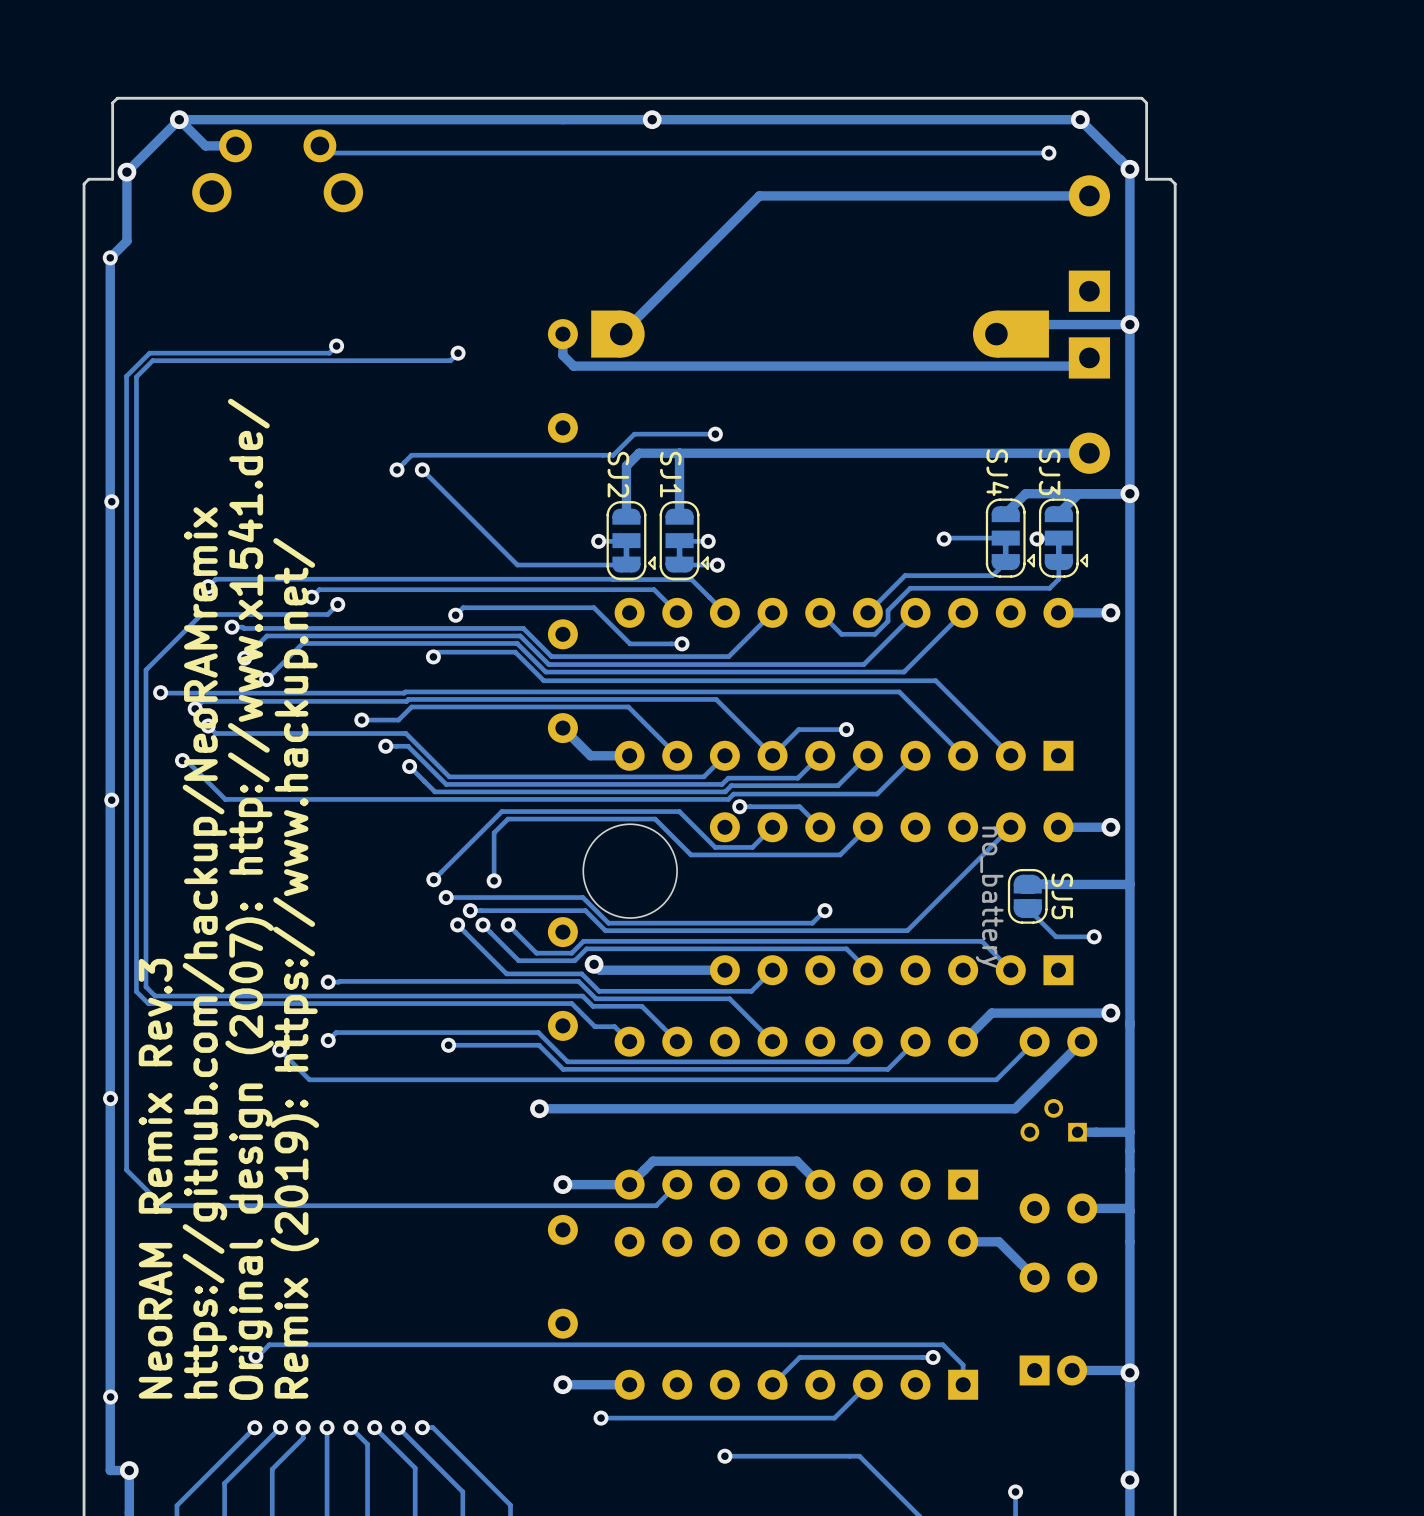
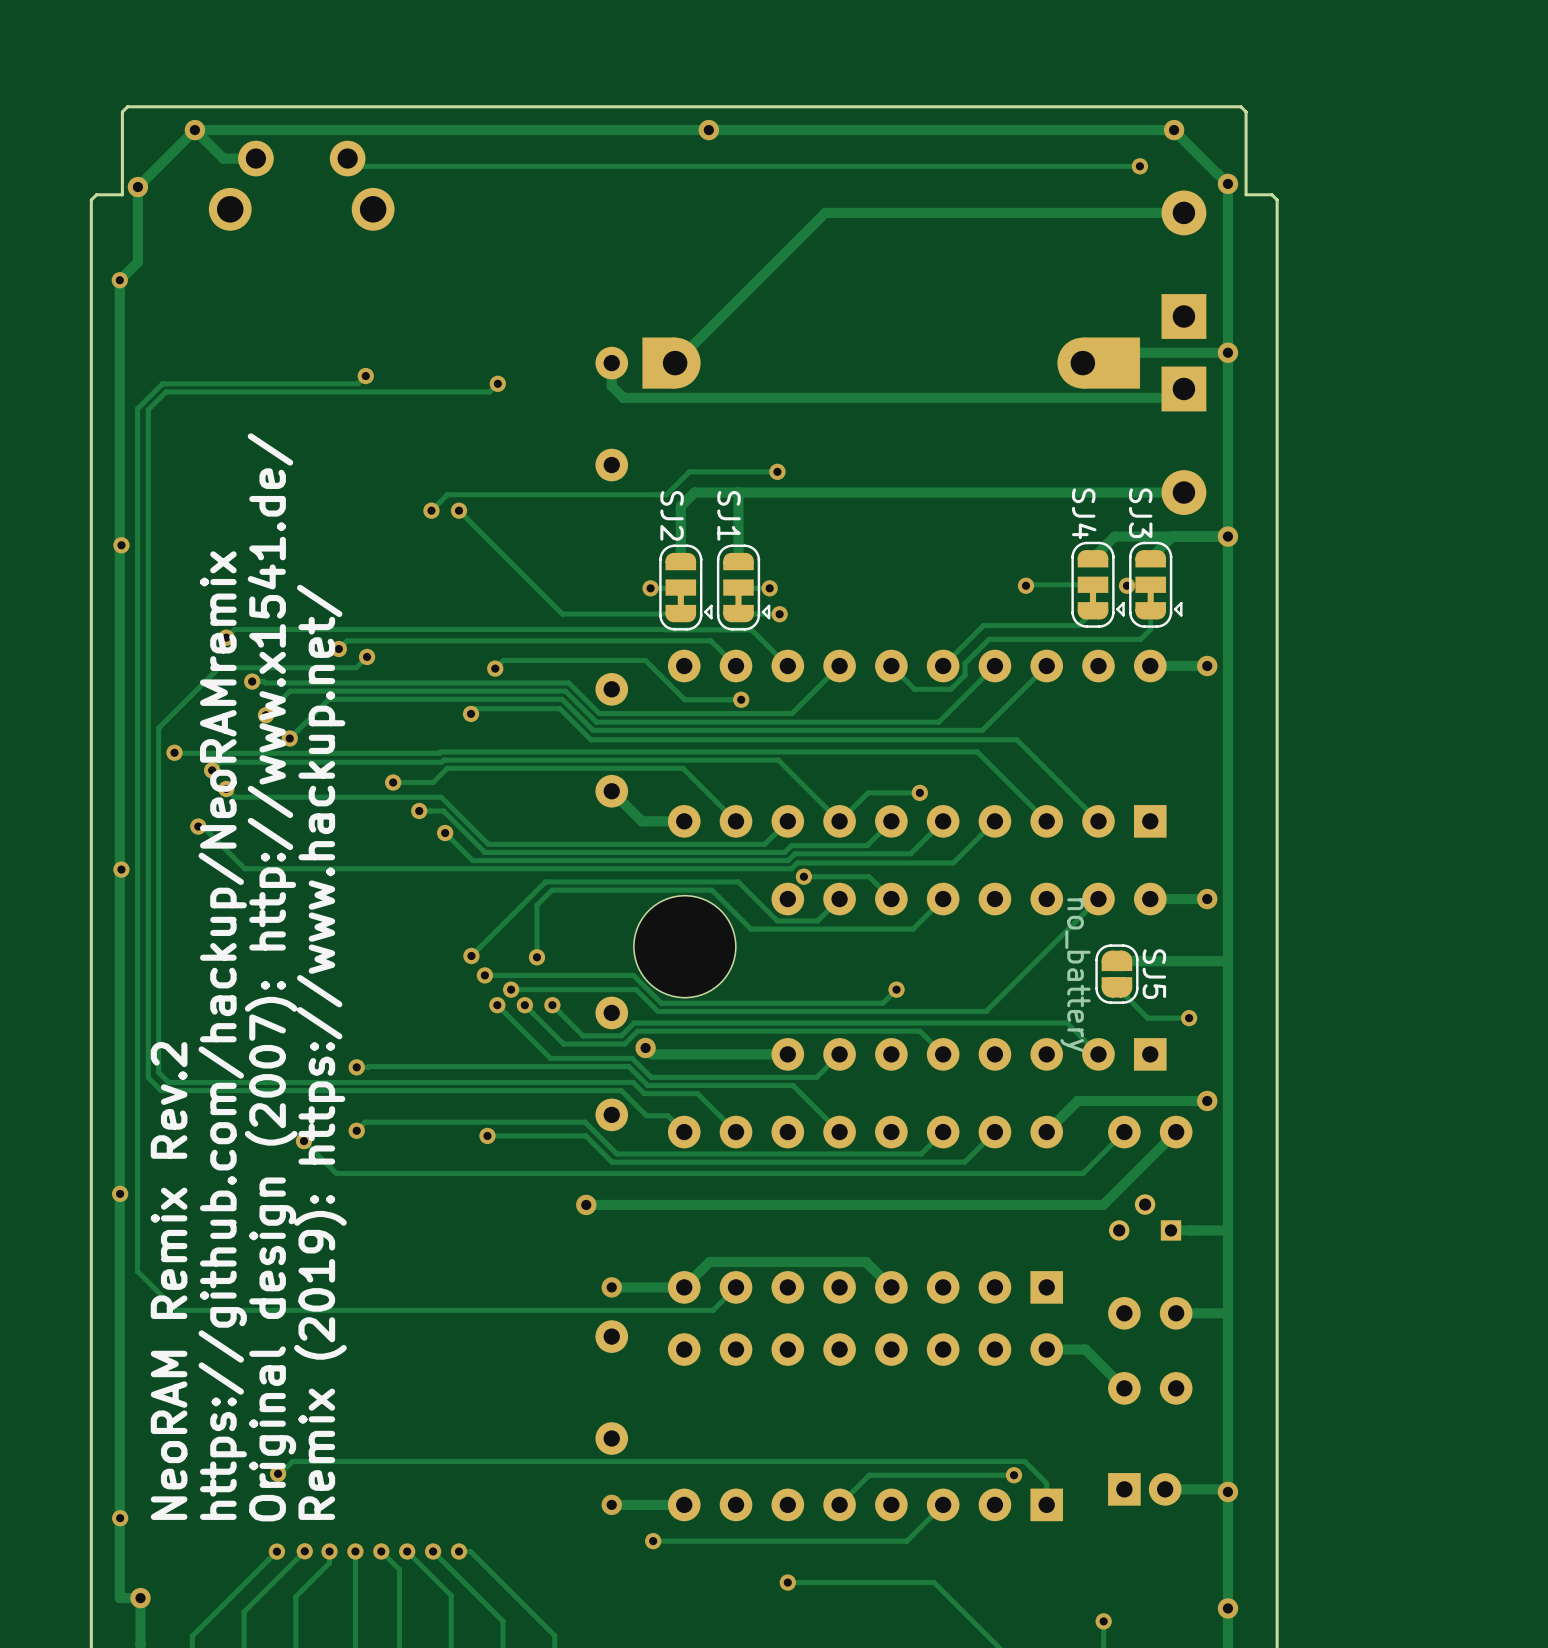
text: NeoRAM Remix Rev.3 (155, 1178) -> NeoRAM Remix Rev.2 (169, 1280)

